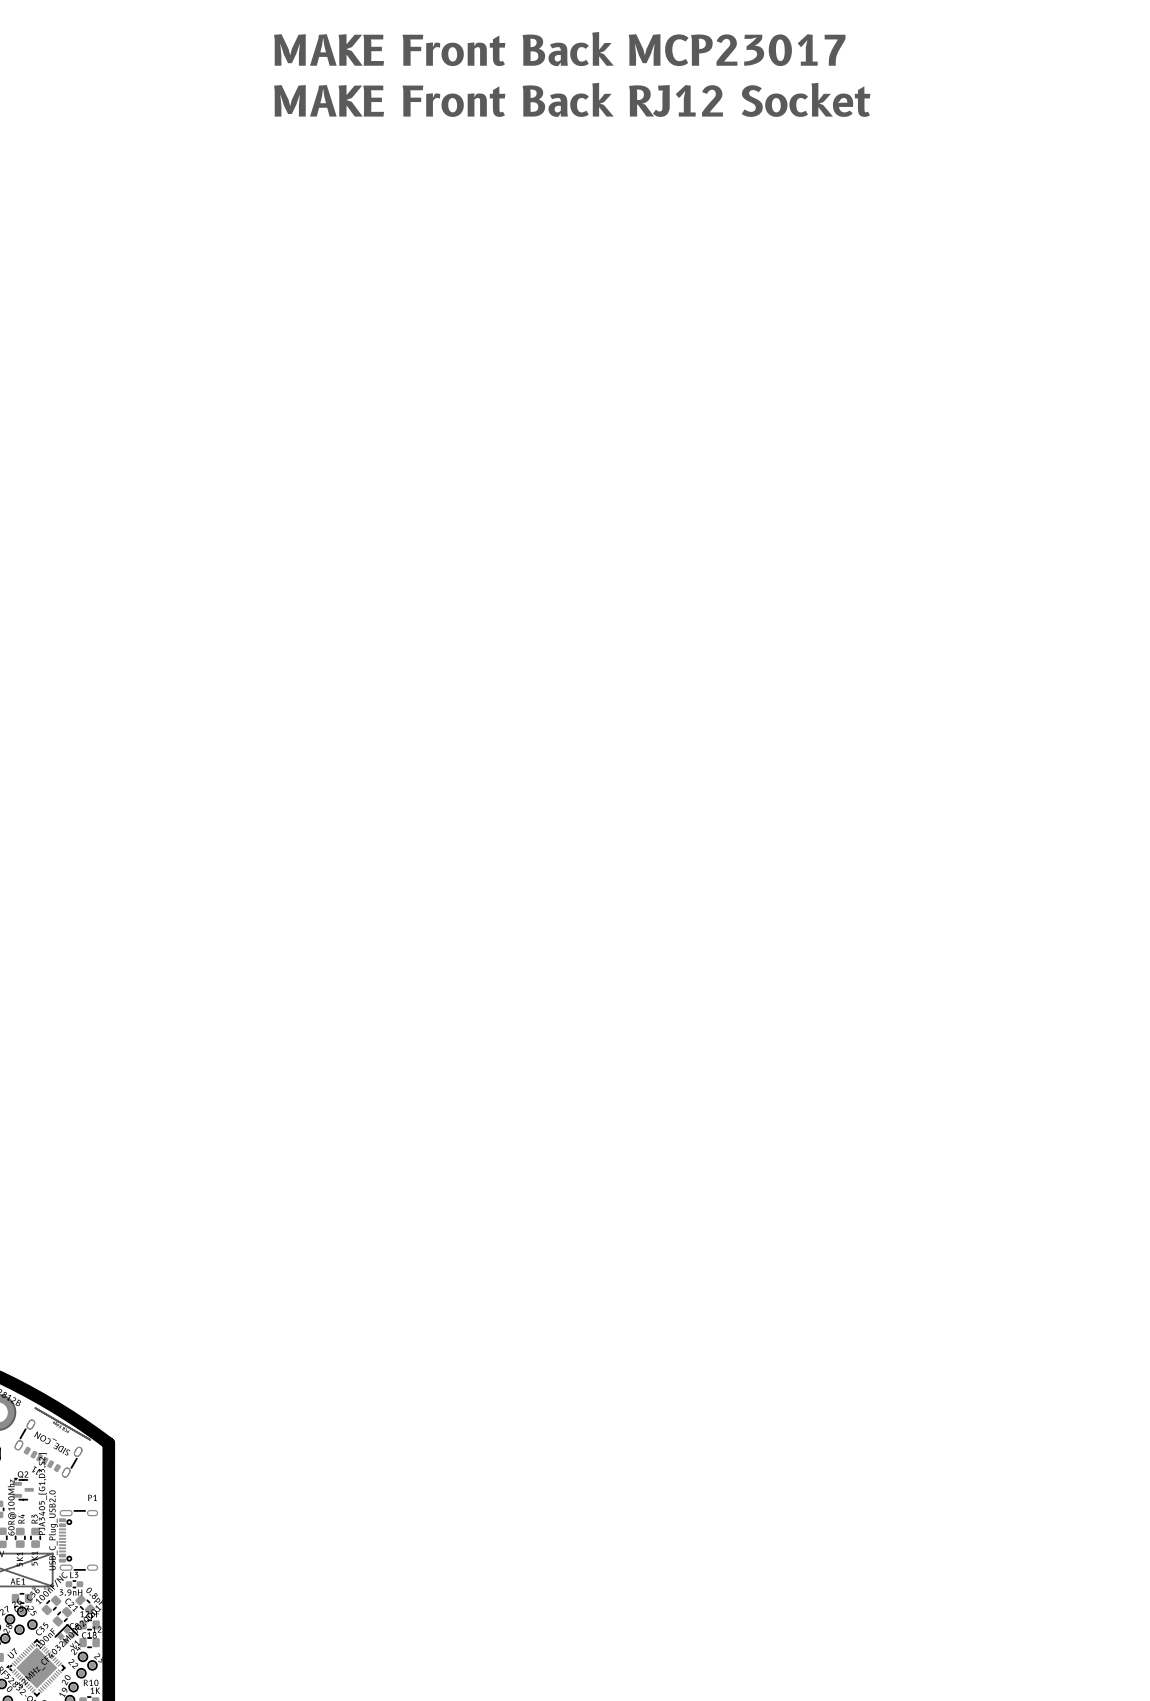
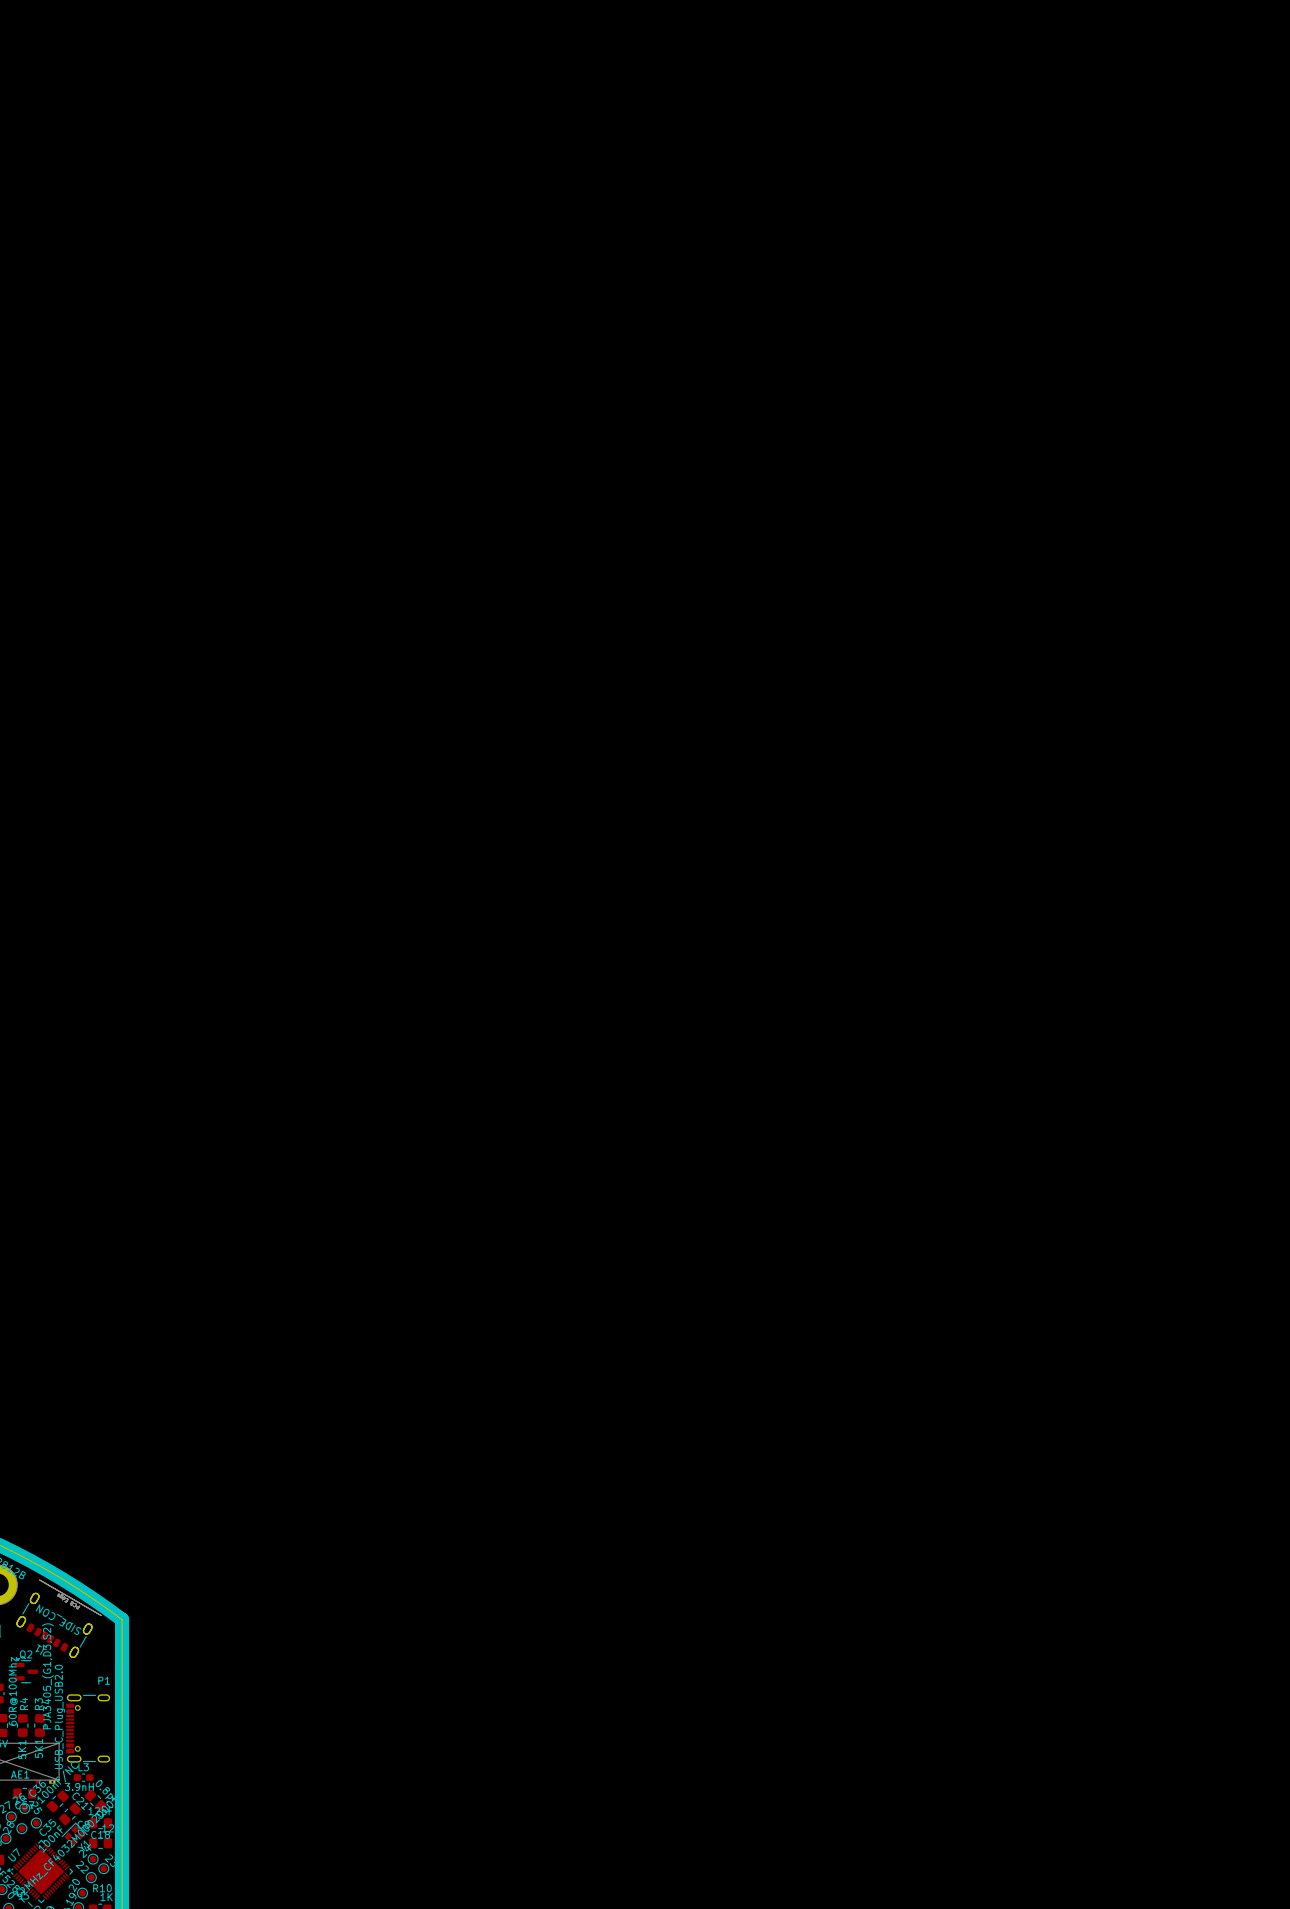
text: MAKE Front Back MCP23017 (559, 49) -> none
text: MAKE Front Back RJ12 Socket (572, 99) -> none

